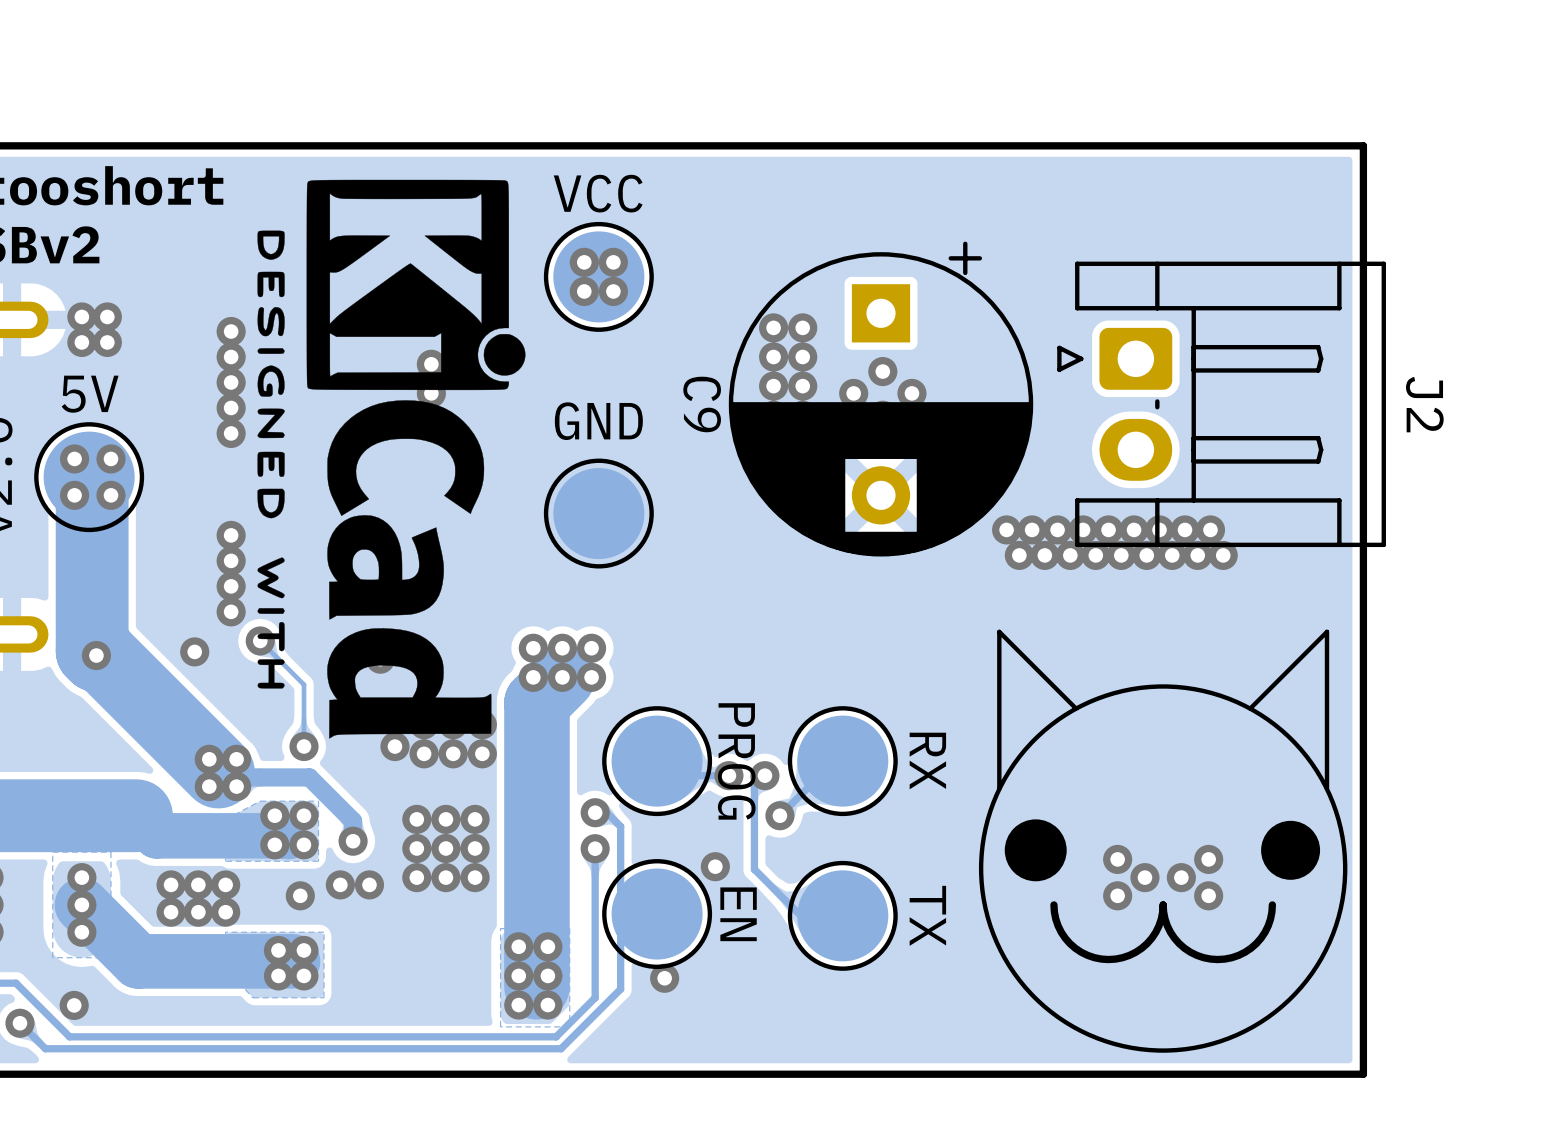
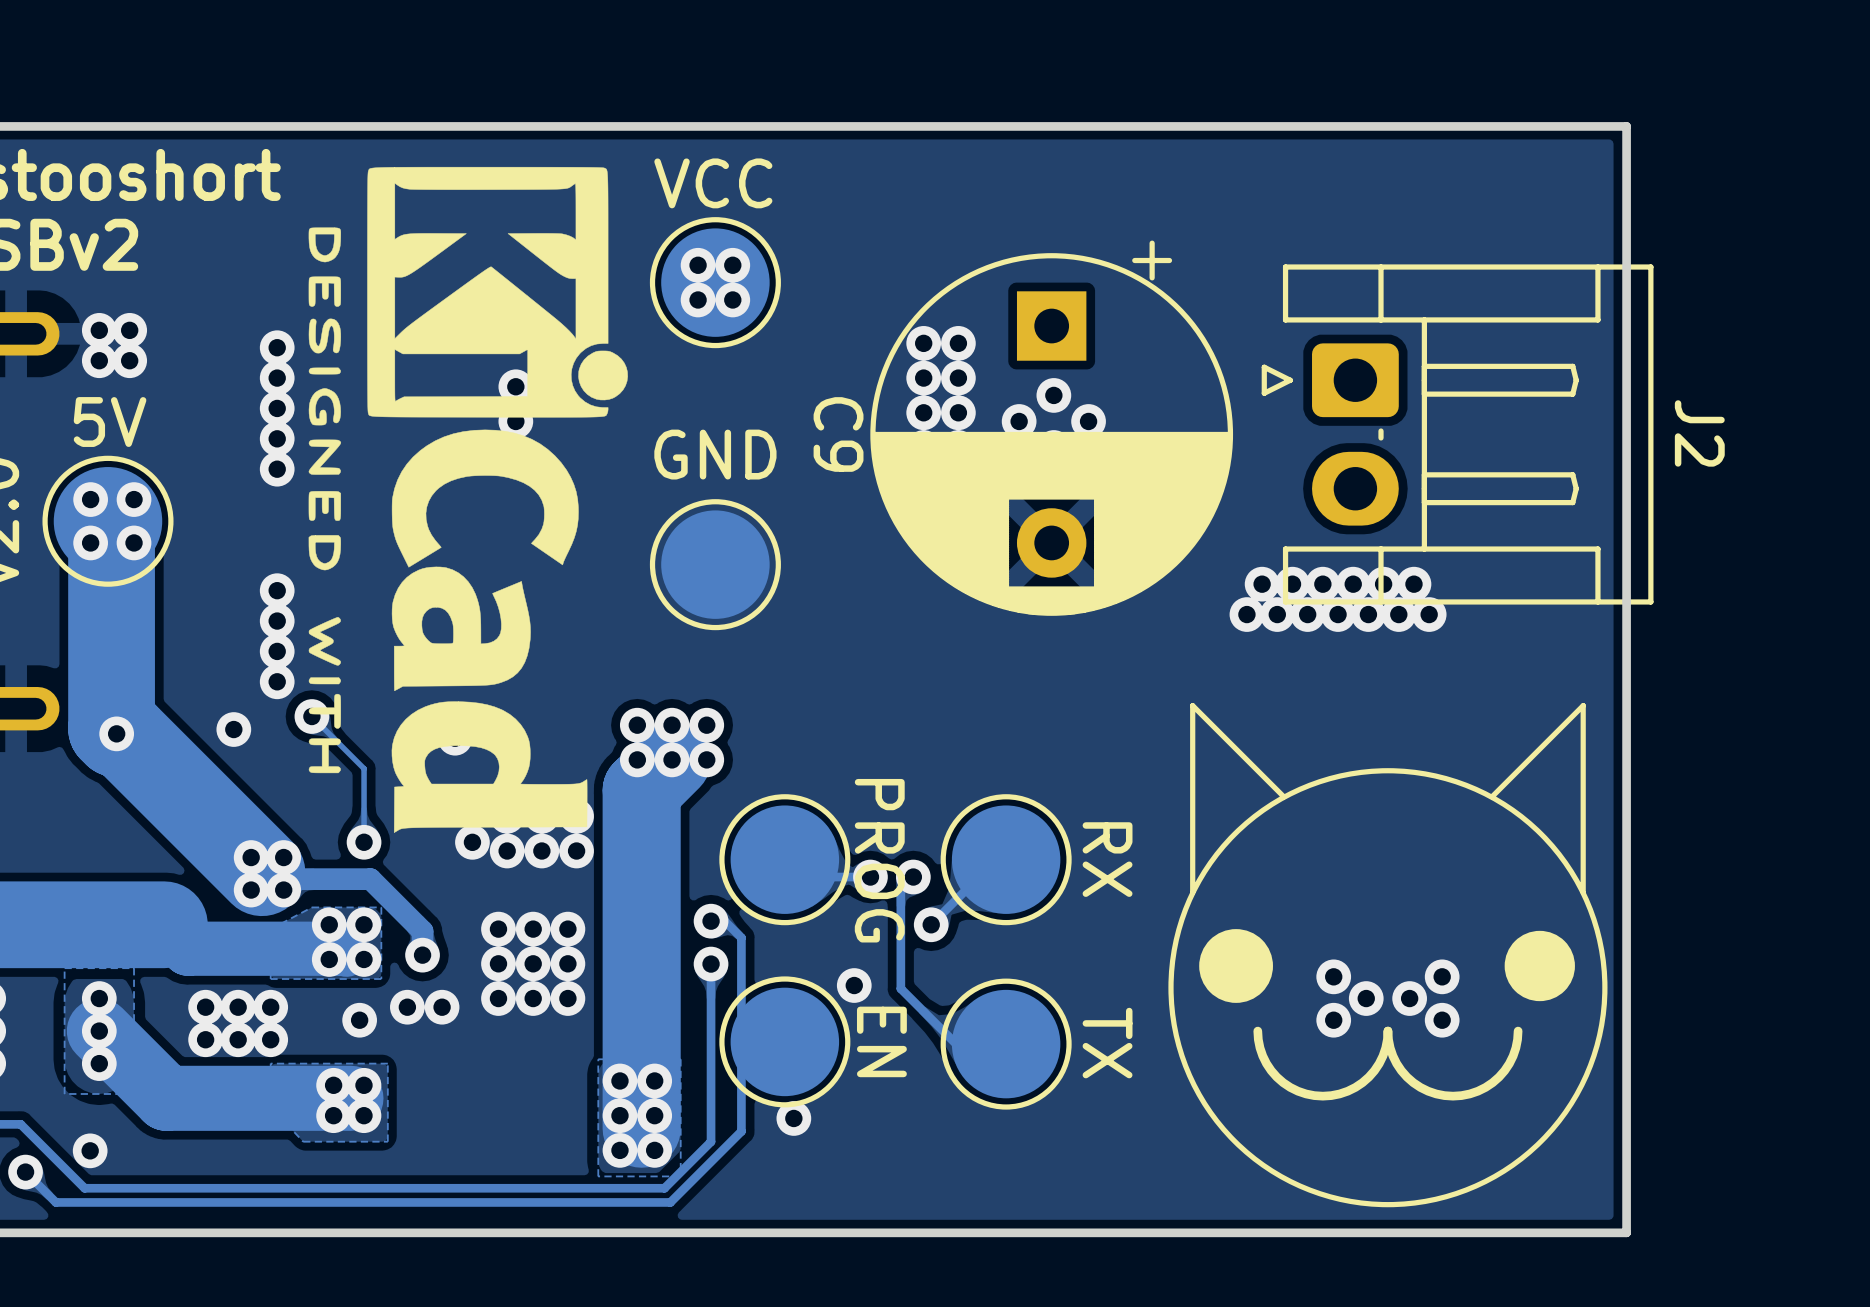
via: (1006, 529) -> none
via: (1032, 529) -> none
via: (1210, 529) -> none
via: (1019, 555) -> none
via: (1223, 555) -> none

